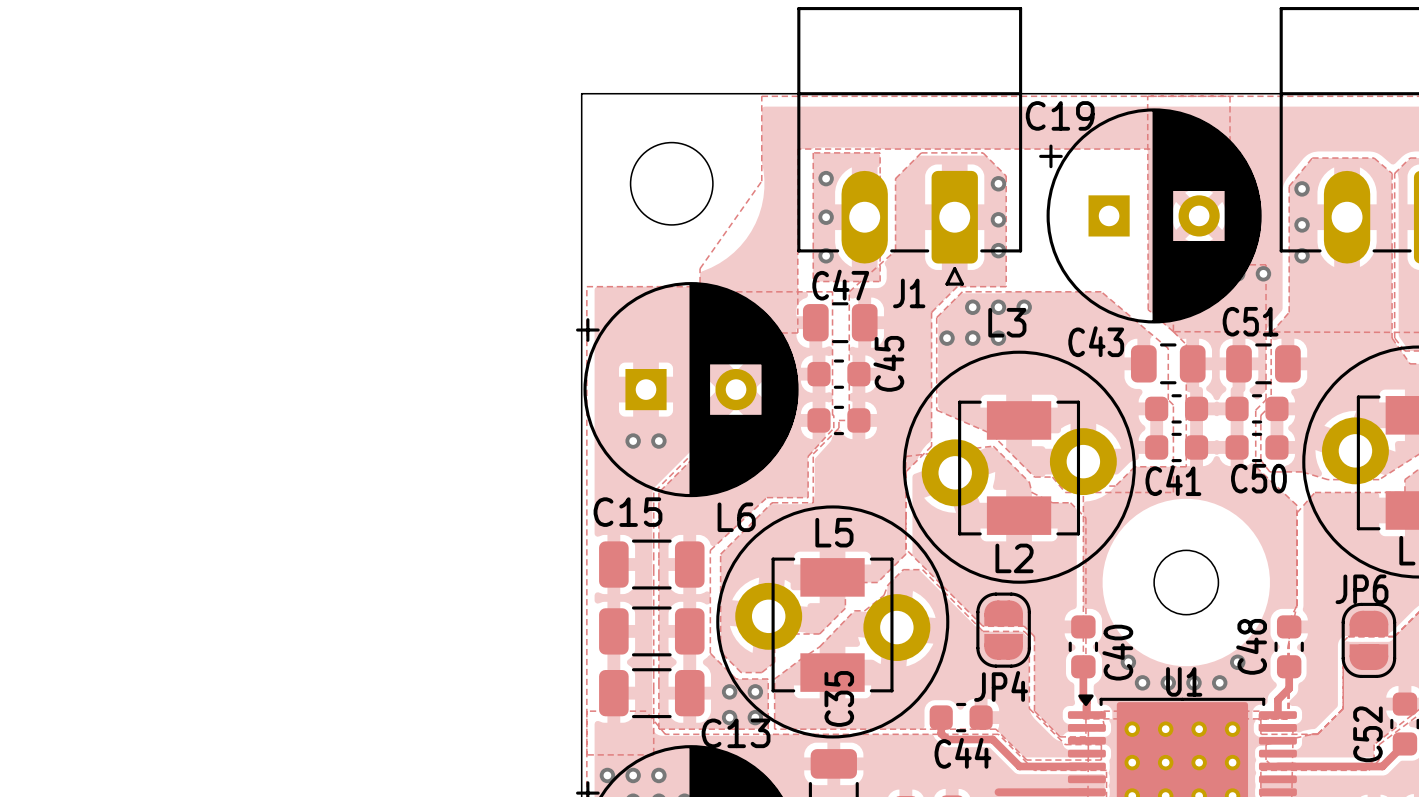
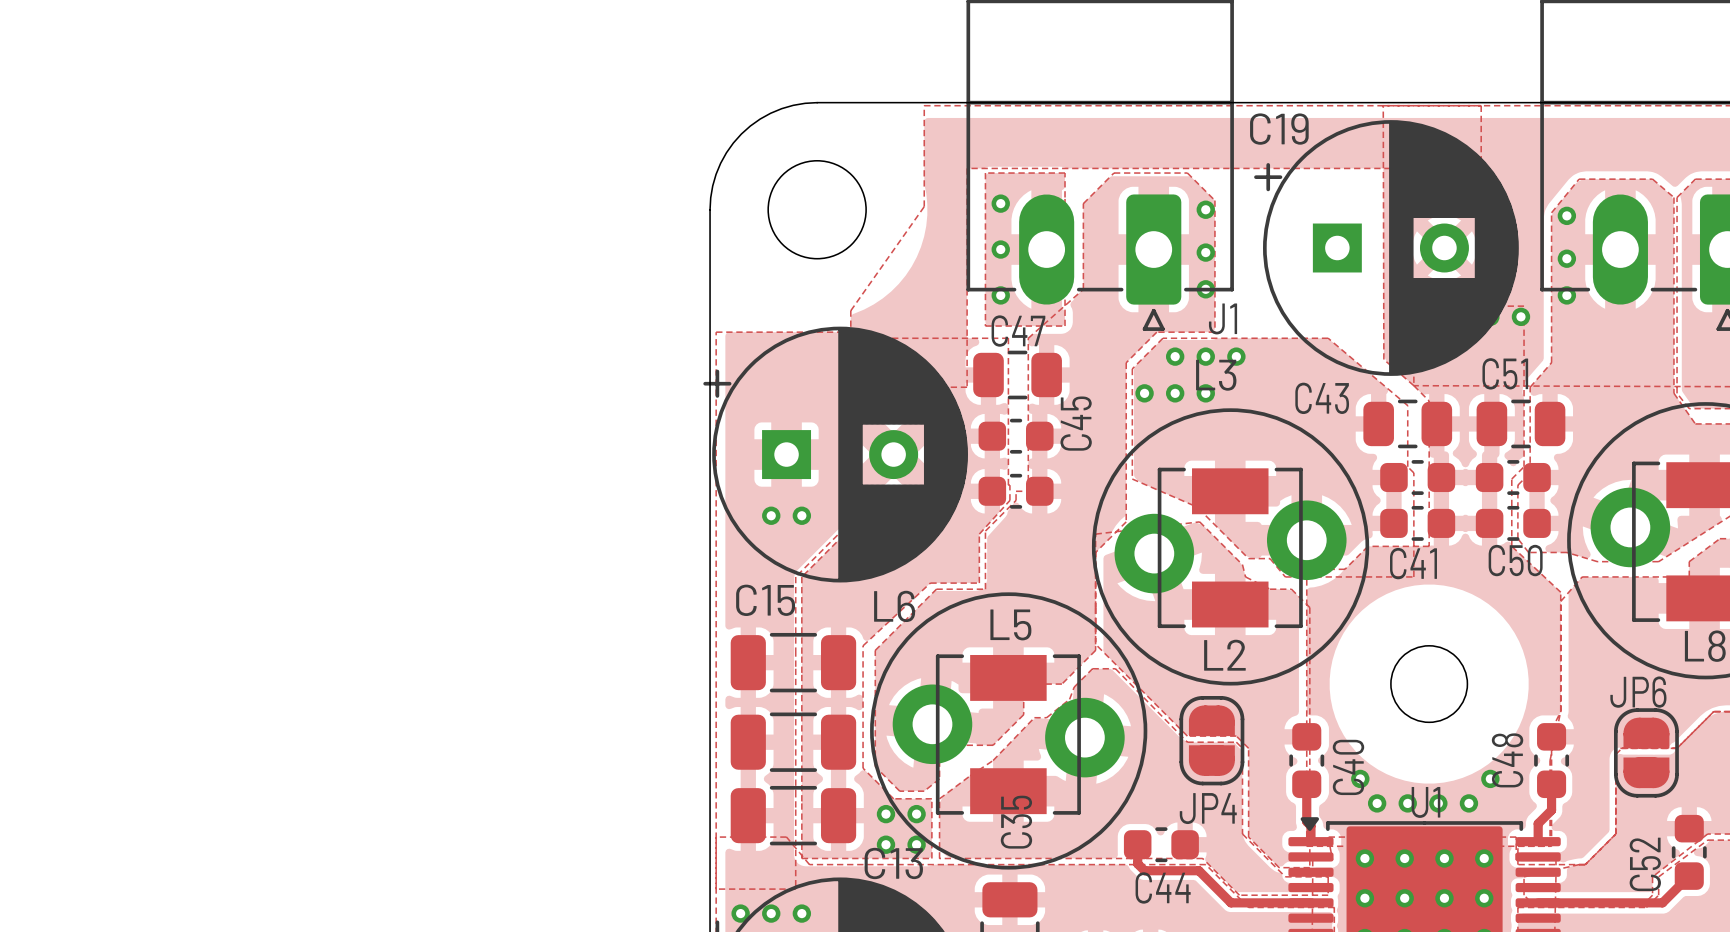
board edge: (671, 93) (581, 93) (581, 183) -> (817, 102) (781, 108) (760, 119) (741, 134) (726, 152) (716, 174) (710, 209)
J1 name position: J1 (909, 293) -> J1 (1223, 318)

